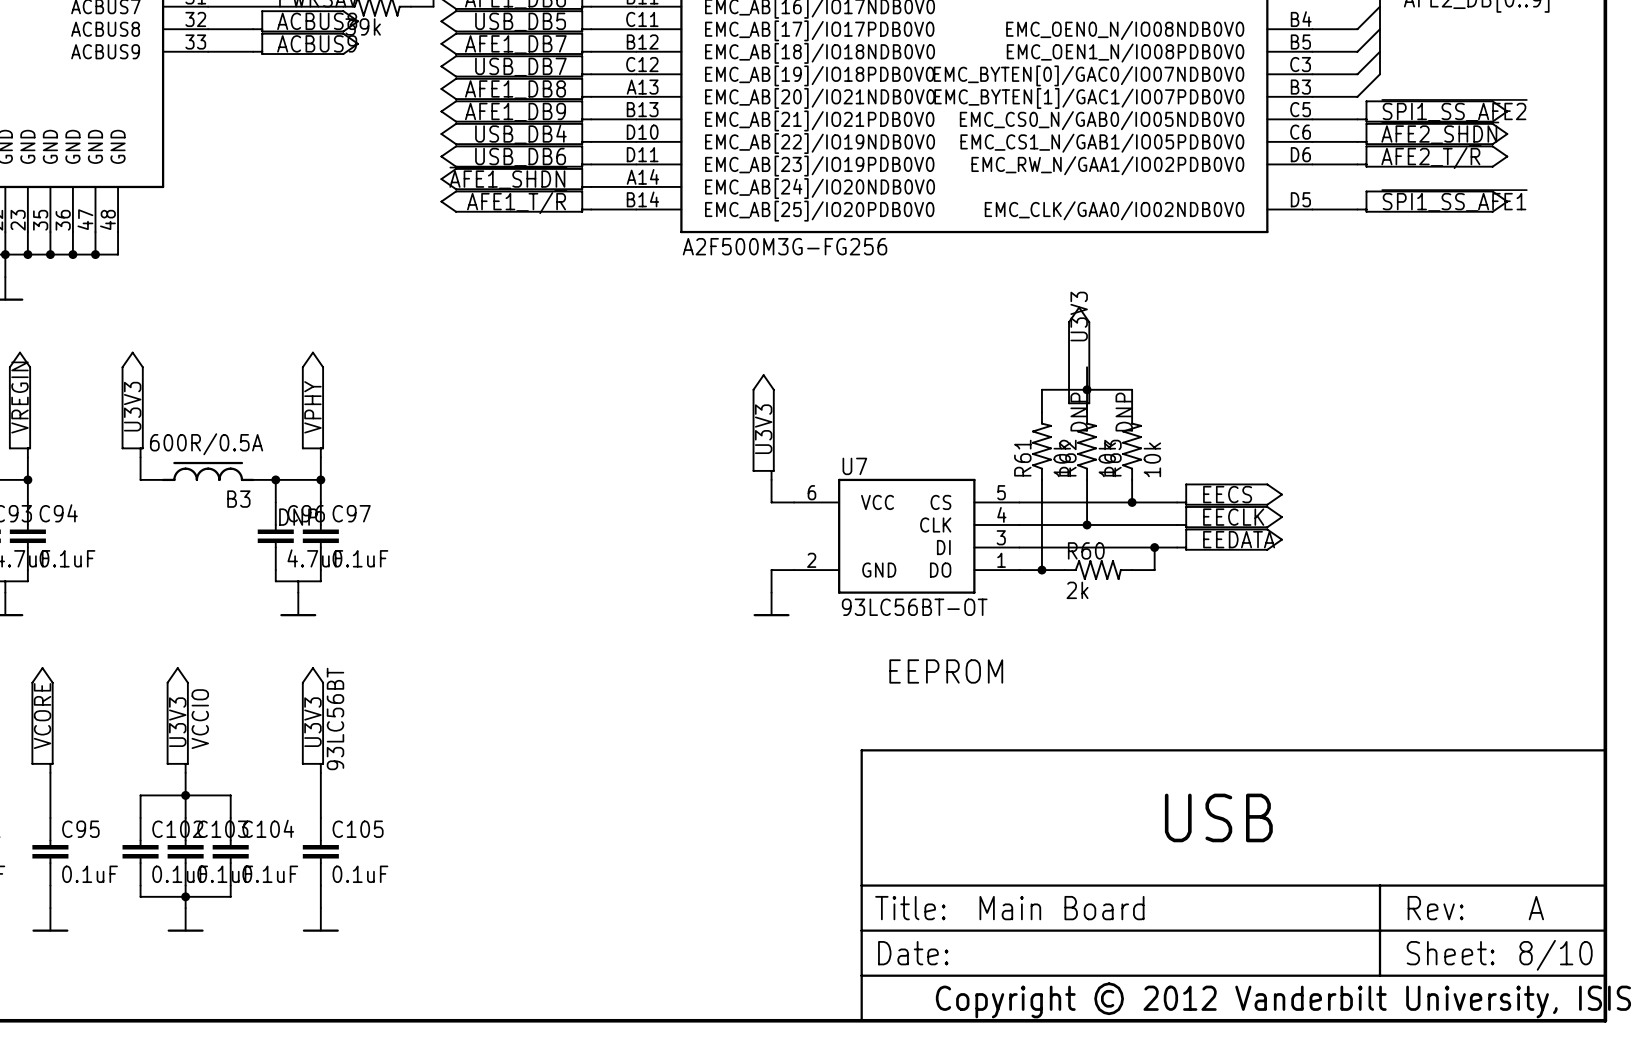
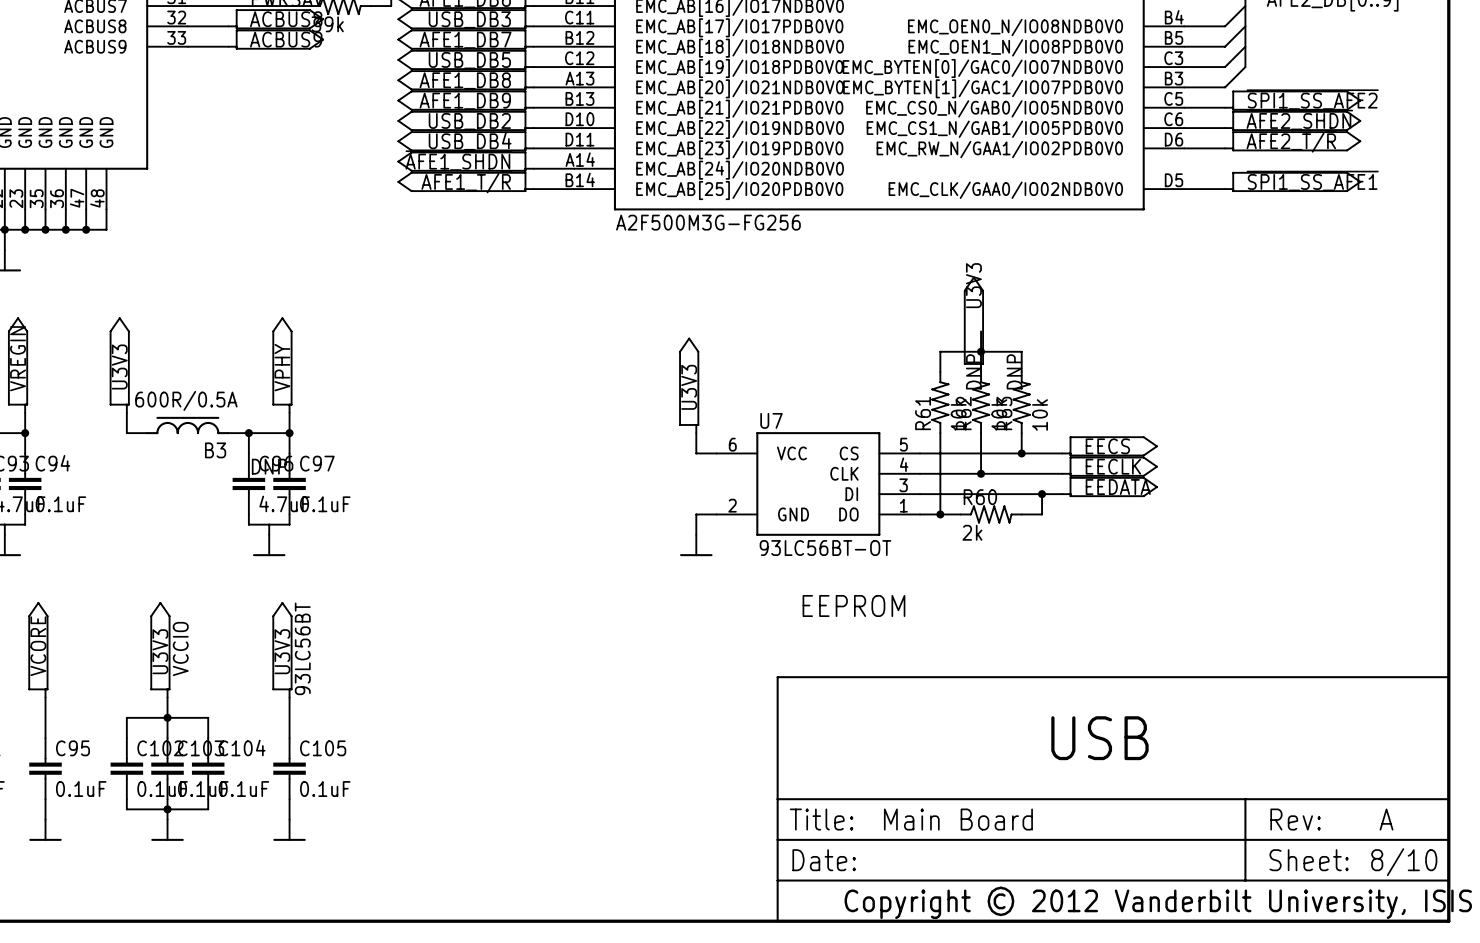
label: USB_DB5 (520, 22) -> USB_DB3 (469, 19)
label: USB_DB7 (520, 67) -> USB_DB5 (469, 60)
label: USB_DB4 (520, 134) -> USB_DB2 (469, 121)
label: USB_DB6 (520, 157) -> USB_DB4 (470, 141)

